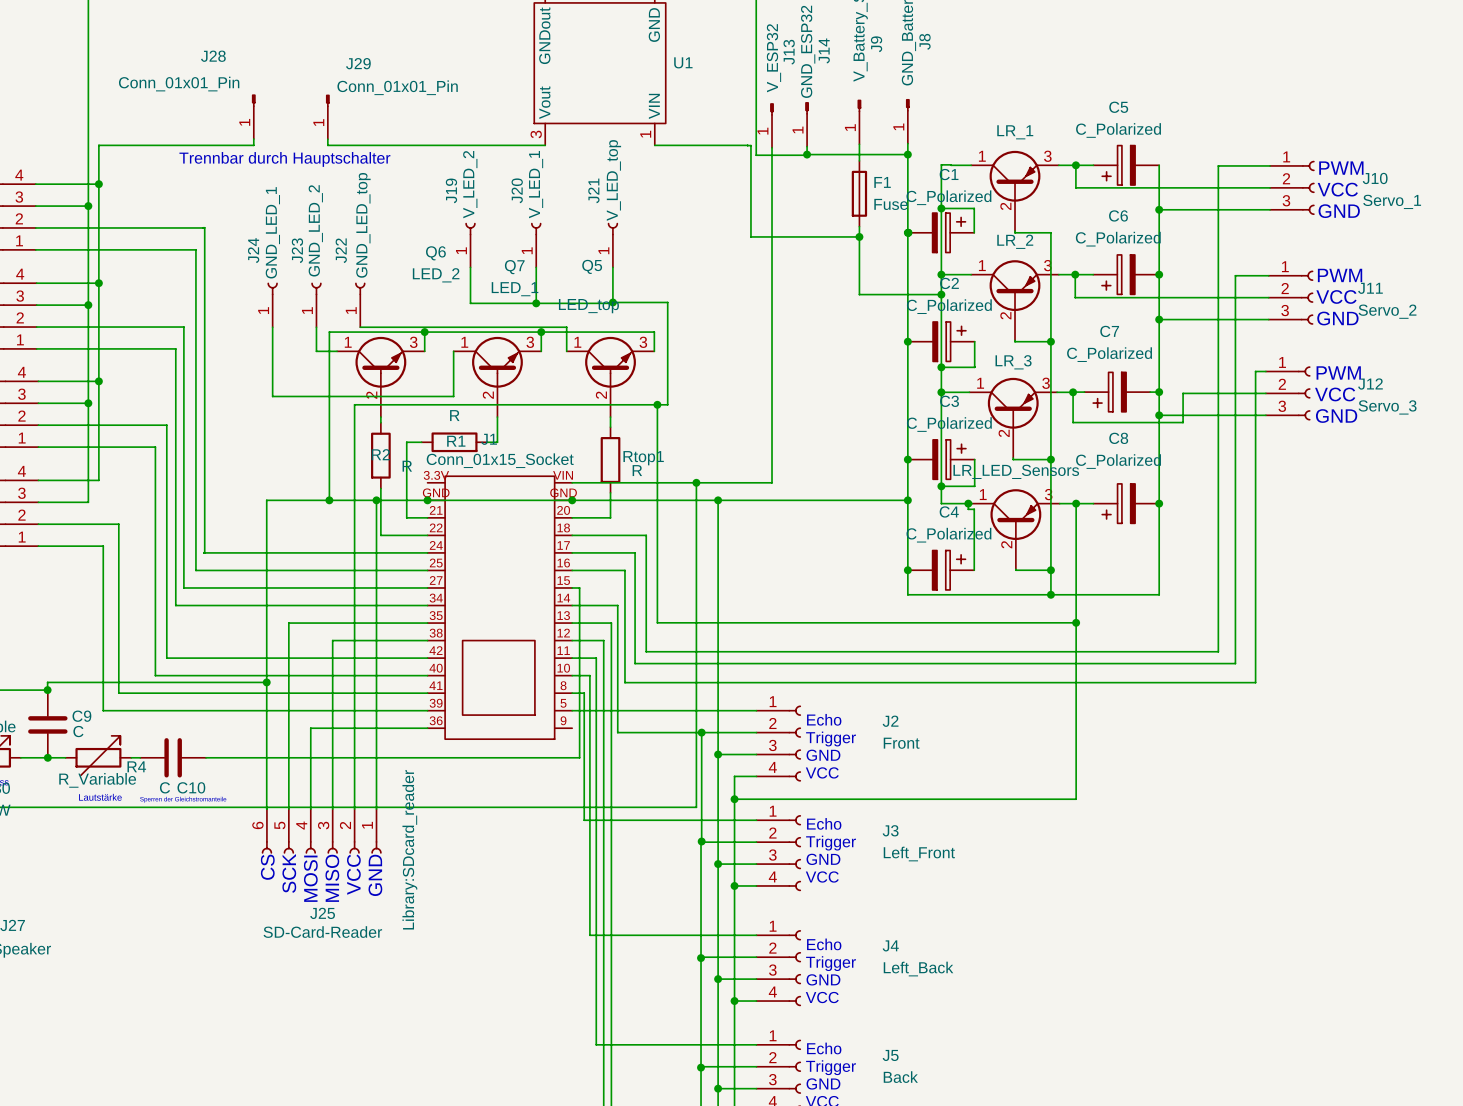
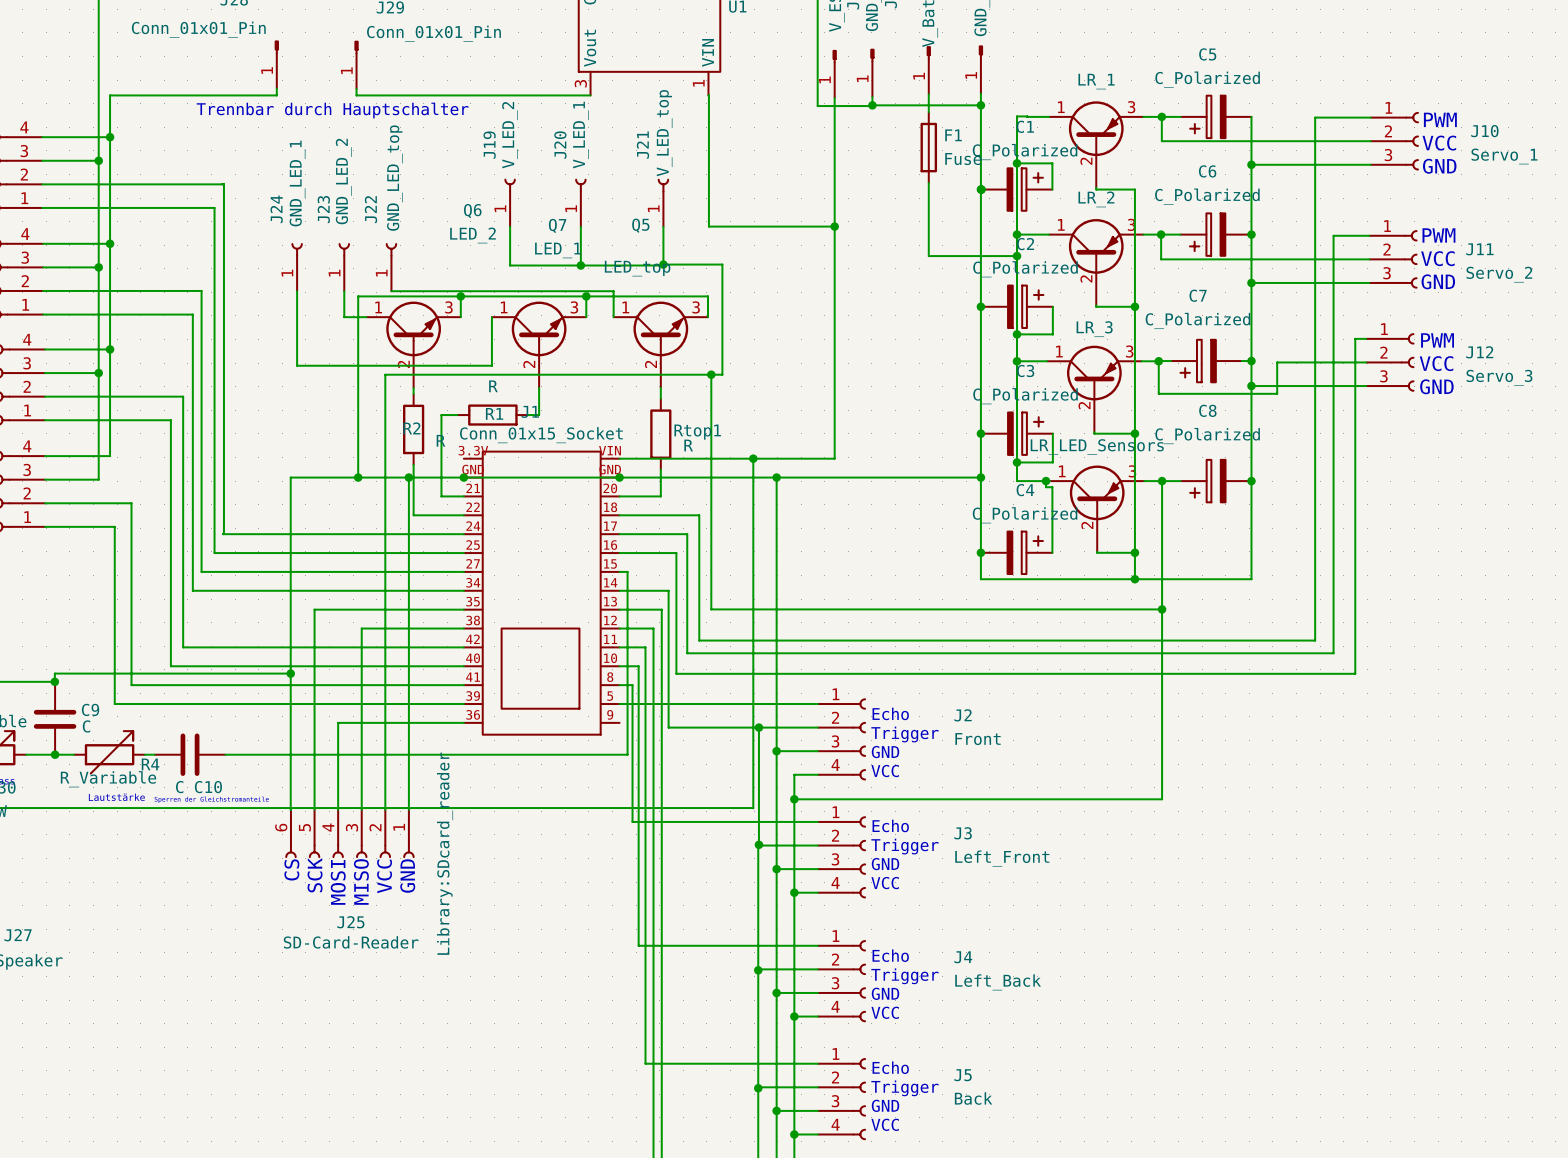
wire: (655, 145) (750, 145) (750, 236) (860, 236) -> (708, 95) (708, 226) (834, 226)
junction: (859, 236) -> none
junction: none -> (834, 226)

